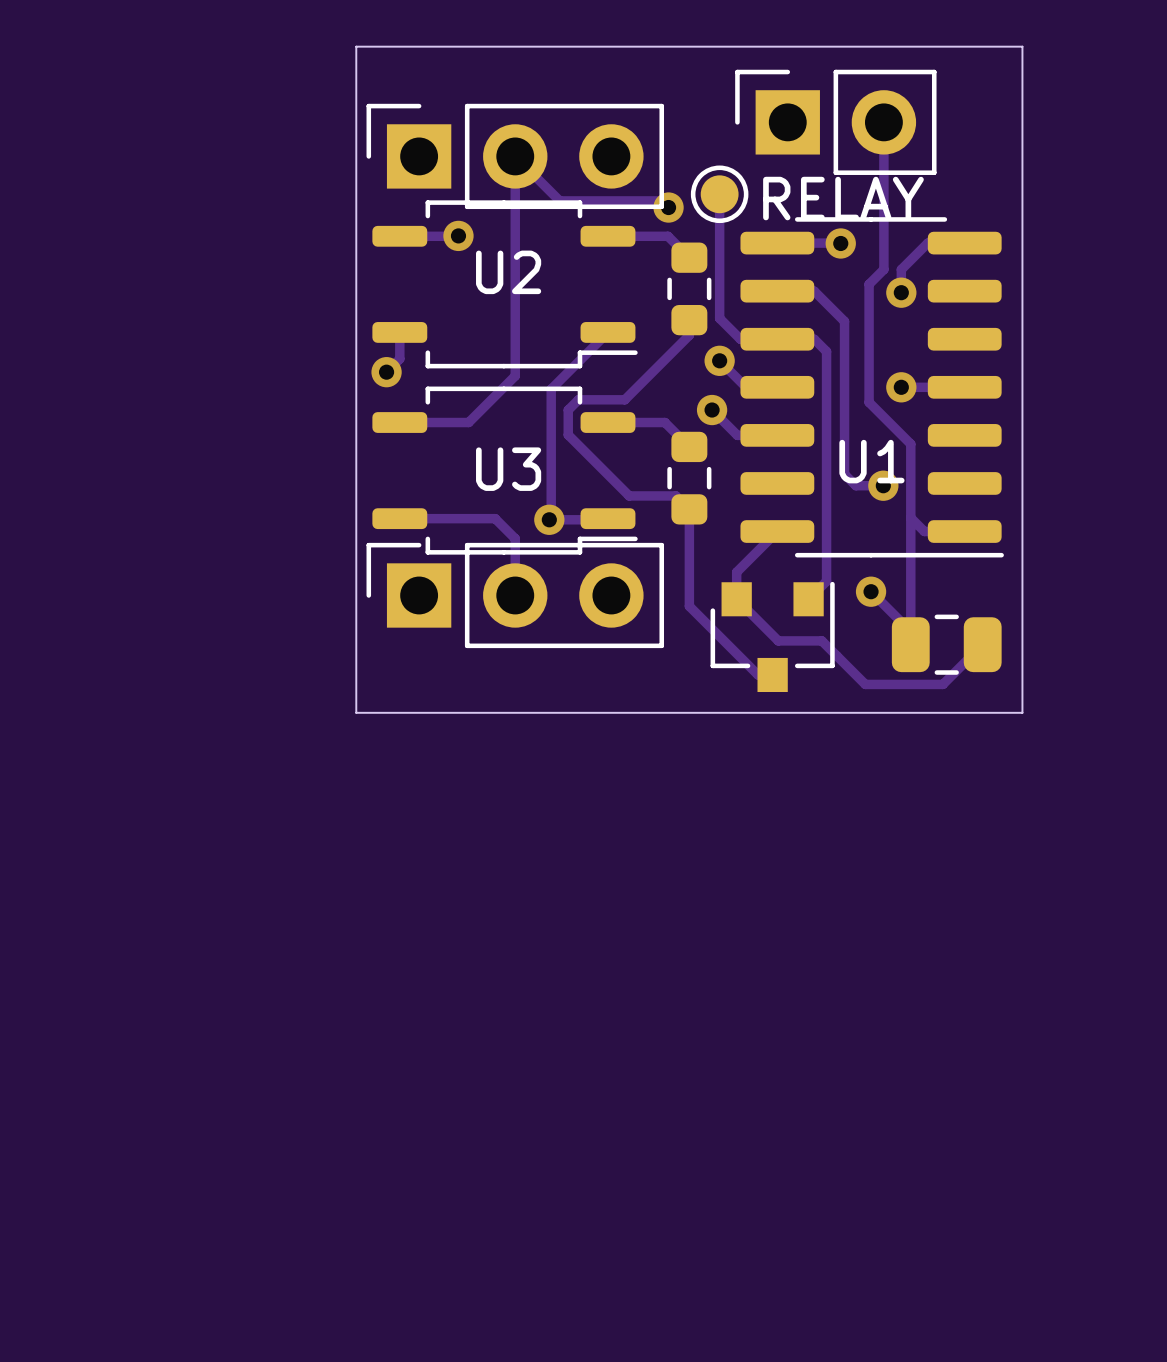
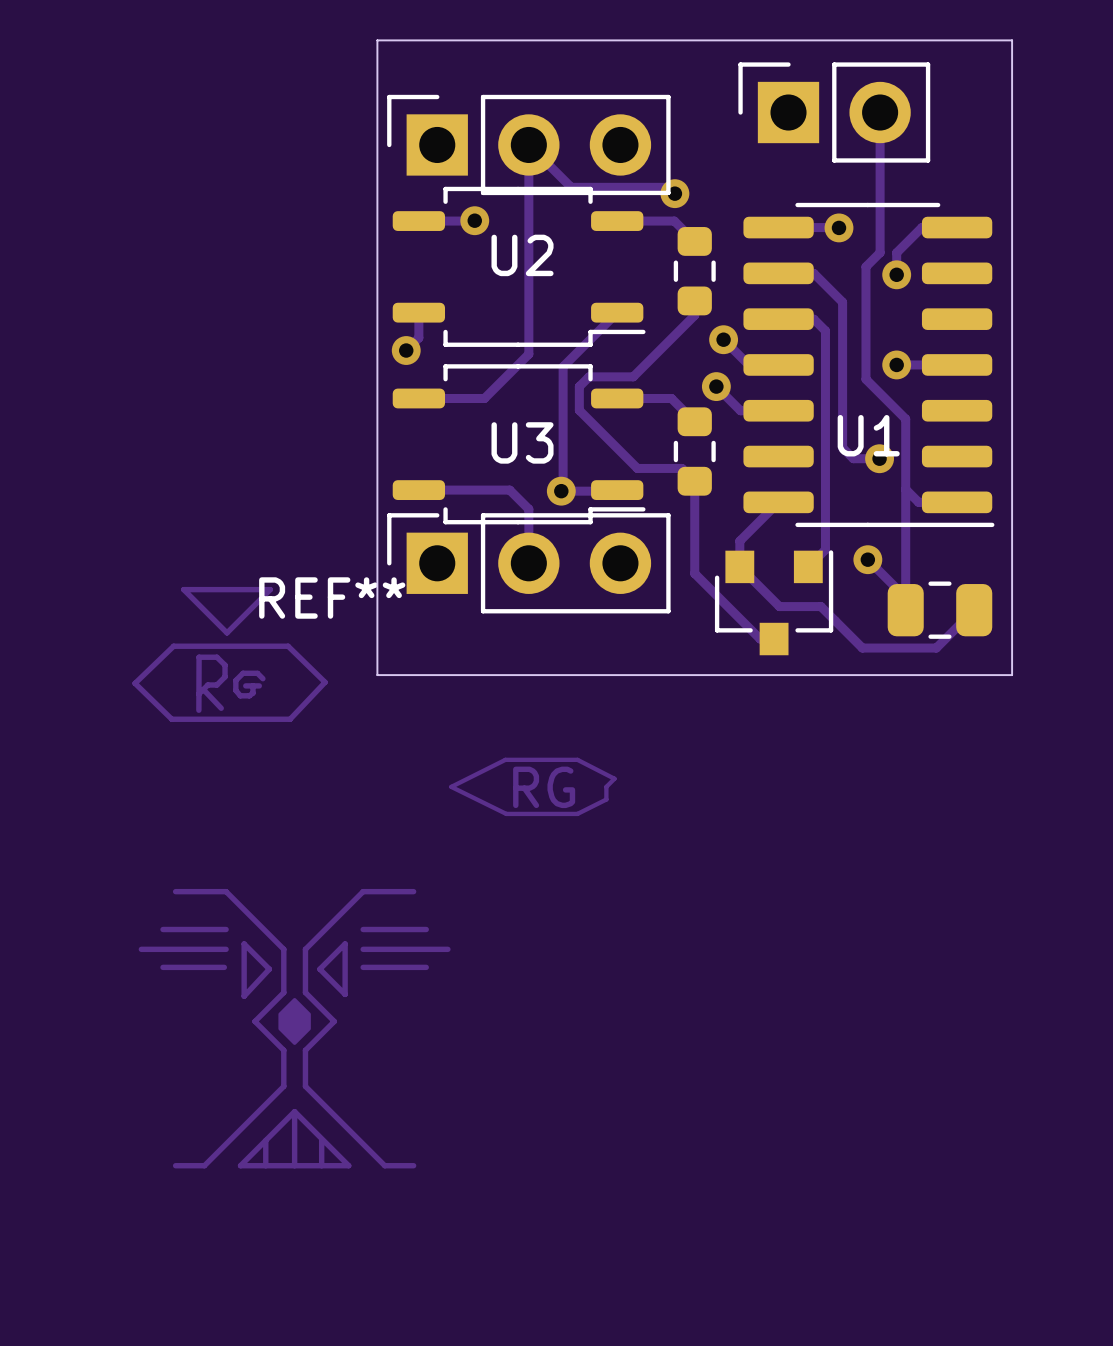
track: (719, 194) (719, 318) (740, 339) (777, 339) -> none
part: RELAY (719, 194) -> none
REF**: none -> (374, 877)

